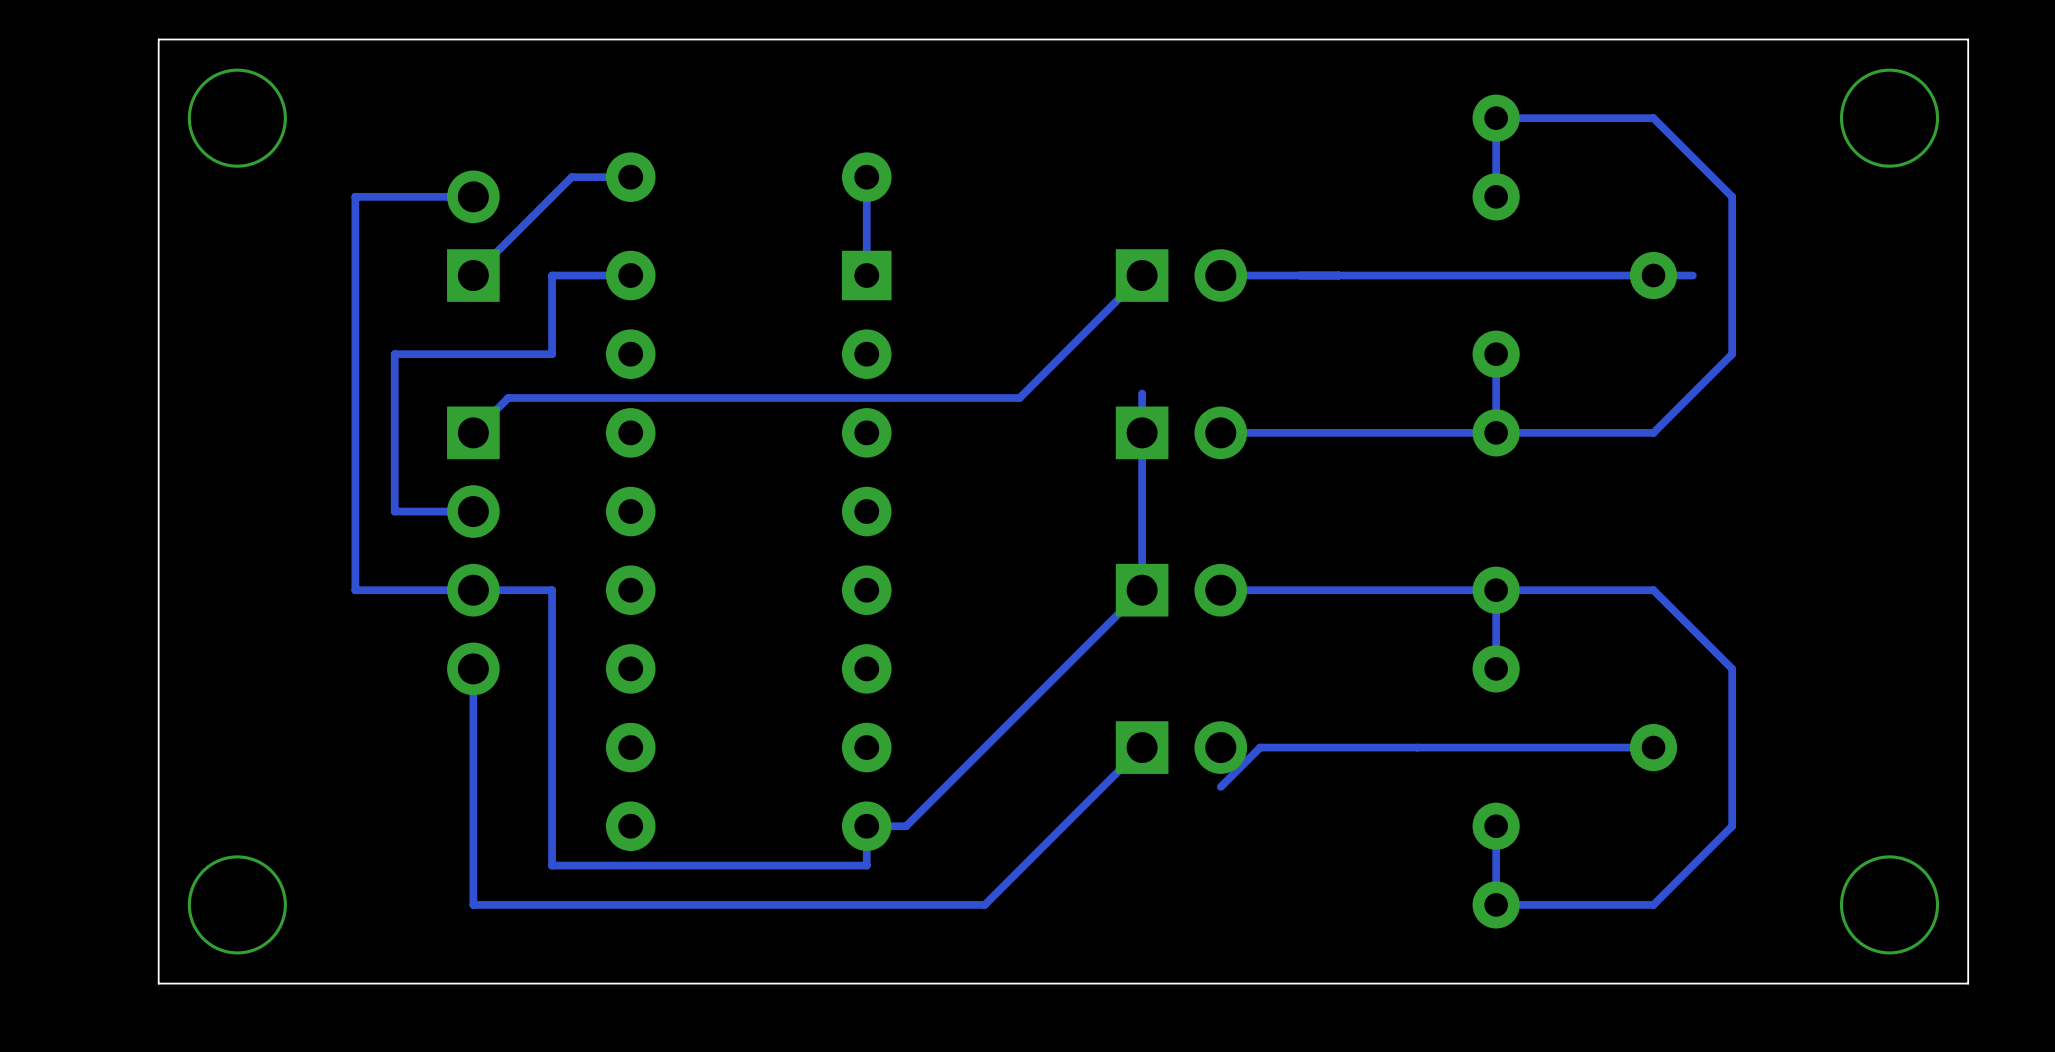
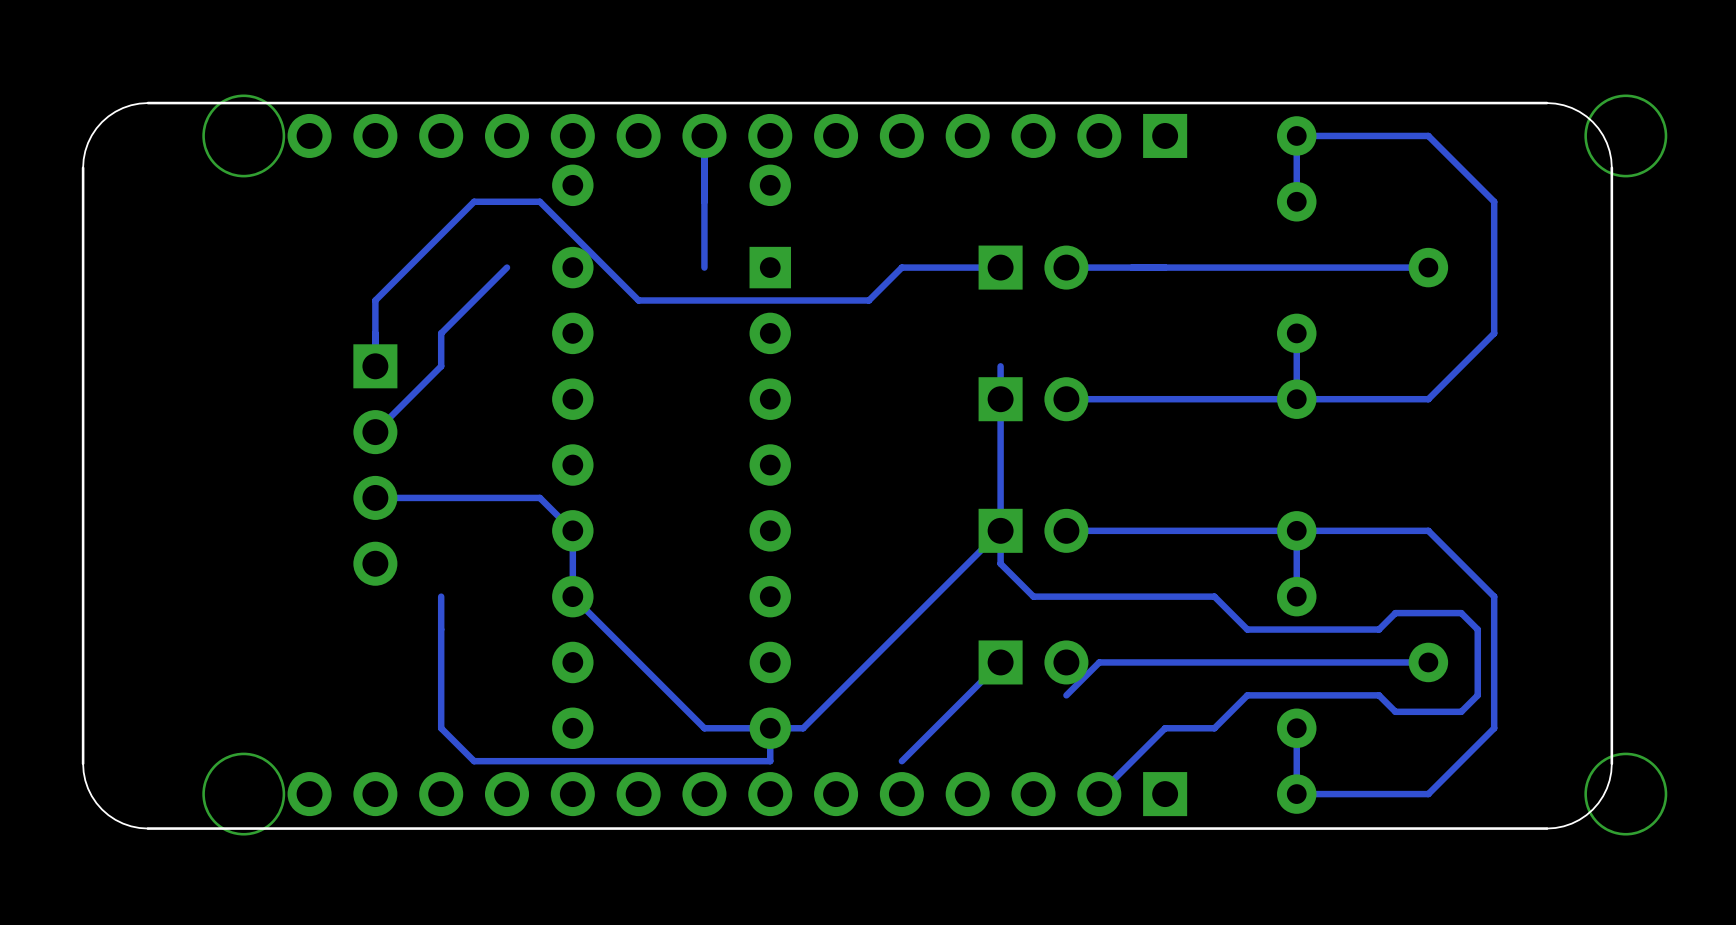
board edge: (1968, 39) (1968, 983) (158, 983) (158, 39) (1968, 39) -> (1547, 103) (1571, 107) (1592, 122) (1606, 143) (1611, 167) (1611, 763) (1609, 780) (1603, 796) (1592, 809) (1571, 823) (1547, 828) (147, 828) (131, 826) (115, 819) (102, 809) (88, 788) (83, 763) (83, 167) (85, 151) (91, 135) (102, 122) (123, 107) (147, 103) (1547, 103)
track: none -> (704, 135) (704, 267)
part: none -> (704, 135)
track: (630, 177) (571, 177) (473, 275) -> none
track: (473, 196) (355, 196) (355, 590) (552, 590) (552, 865) -> none
track: (866, 196) (866, 275) -> none
part: (473, 236) -> none
track: none -> (507, 267) (441, 333) (441, 366) (375, 432)
track: (630, 275) (552, 275) (552, 354) (394, 354) -> none
track: (1142, 275) (1019, 398) (508, 398) (473, 432) -> (1000, 267) (901, 267) (868, 300) (638, 300) (539, 201) (474, 201) (375, 300) (375, 333)
track: (1692, 275) (1653, 275) -> none
track: (394, 393) (394, 511) (473, 511) -> none
track: none -> (375, 497) (539, 497) (572, 530) (572, 596) (704, 728) (770, 728)
part position: (473, 550) -> (375, 465)
track: none -> (1000, 530) (1000, 563) (1033, 596) (1214, 596) (1247, 629) (1379, 629) (1395, 613) (1461, 613) (1477, 629) (1477, 695) (1461, 711) (1395, 711) (1379, 695) (1247, 695) (1214, 728) (1165, 728) (1099, 794)
track: (473, 826) (473, 904) (984, 904) (1024, 865) -> (441, 728) (474, 761) (507, 761)
part: none -> (704, 794)

